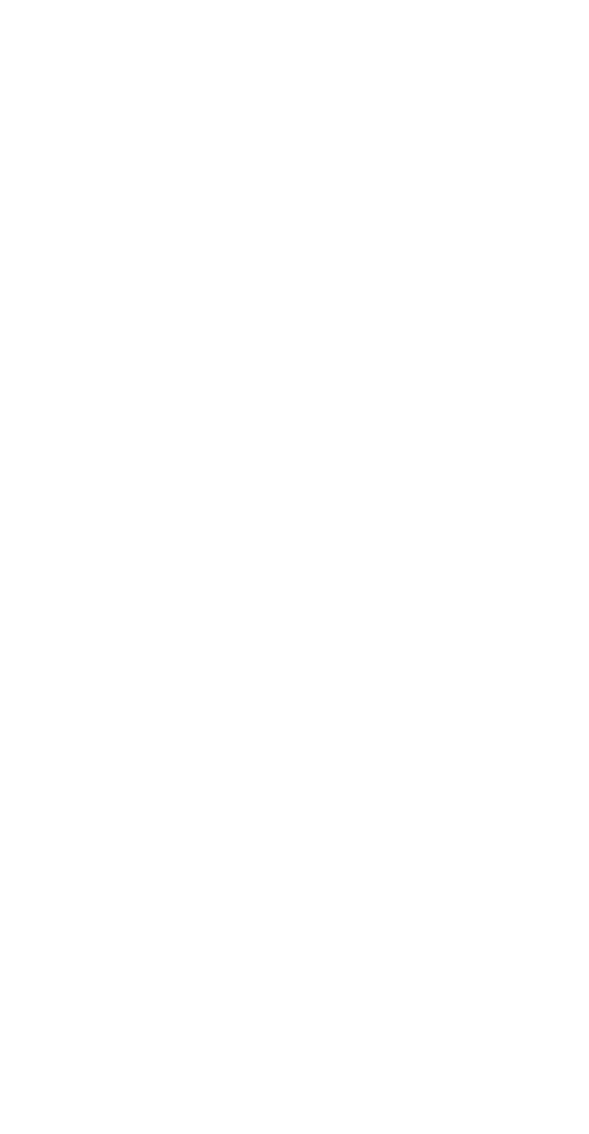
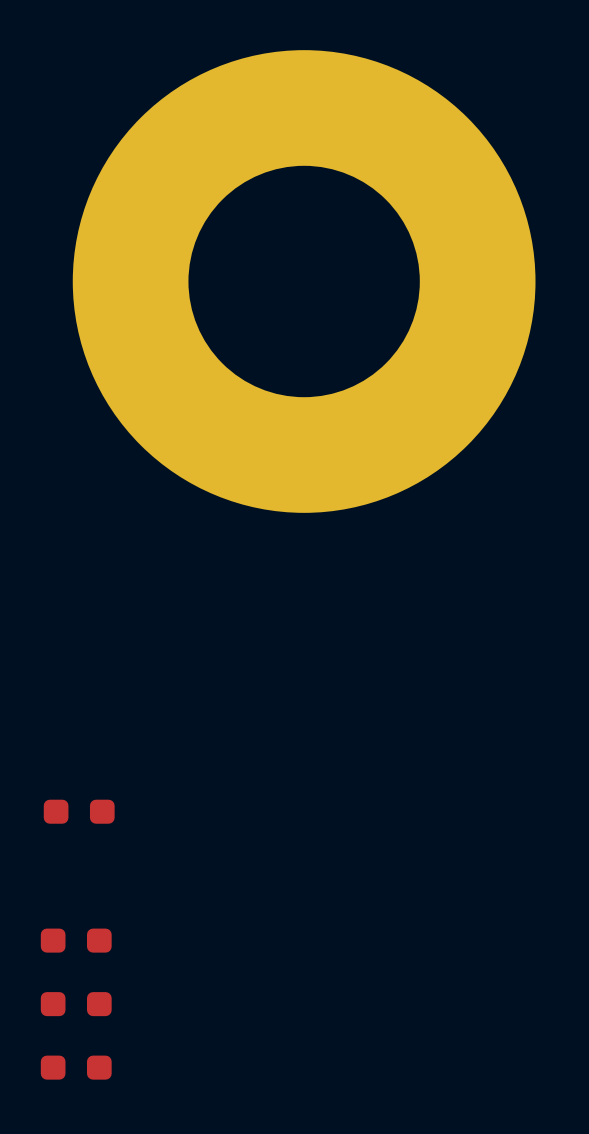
part: none -> (304, 281)
part: none -> (79, 811)
part: none -> (76, 940)
part: none -> (76, 1004)
part: none -> (76, 1067)

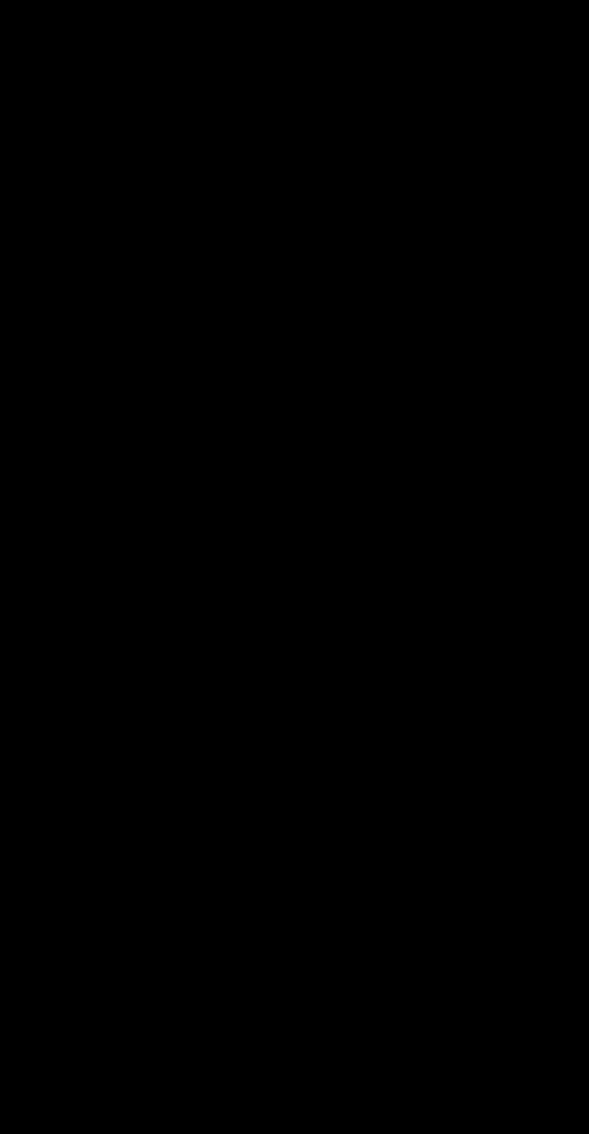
part: (304, 281) -> none
part: (79, 811) -> none
part: (76, 940) -> none
part: (76, 1004) -> none
part: (76, 1067) -> none

